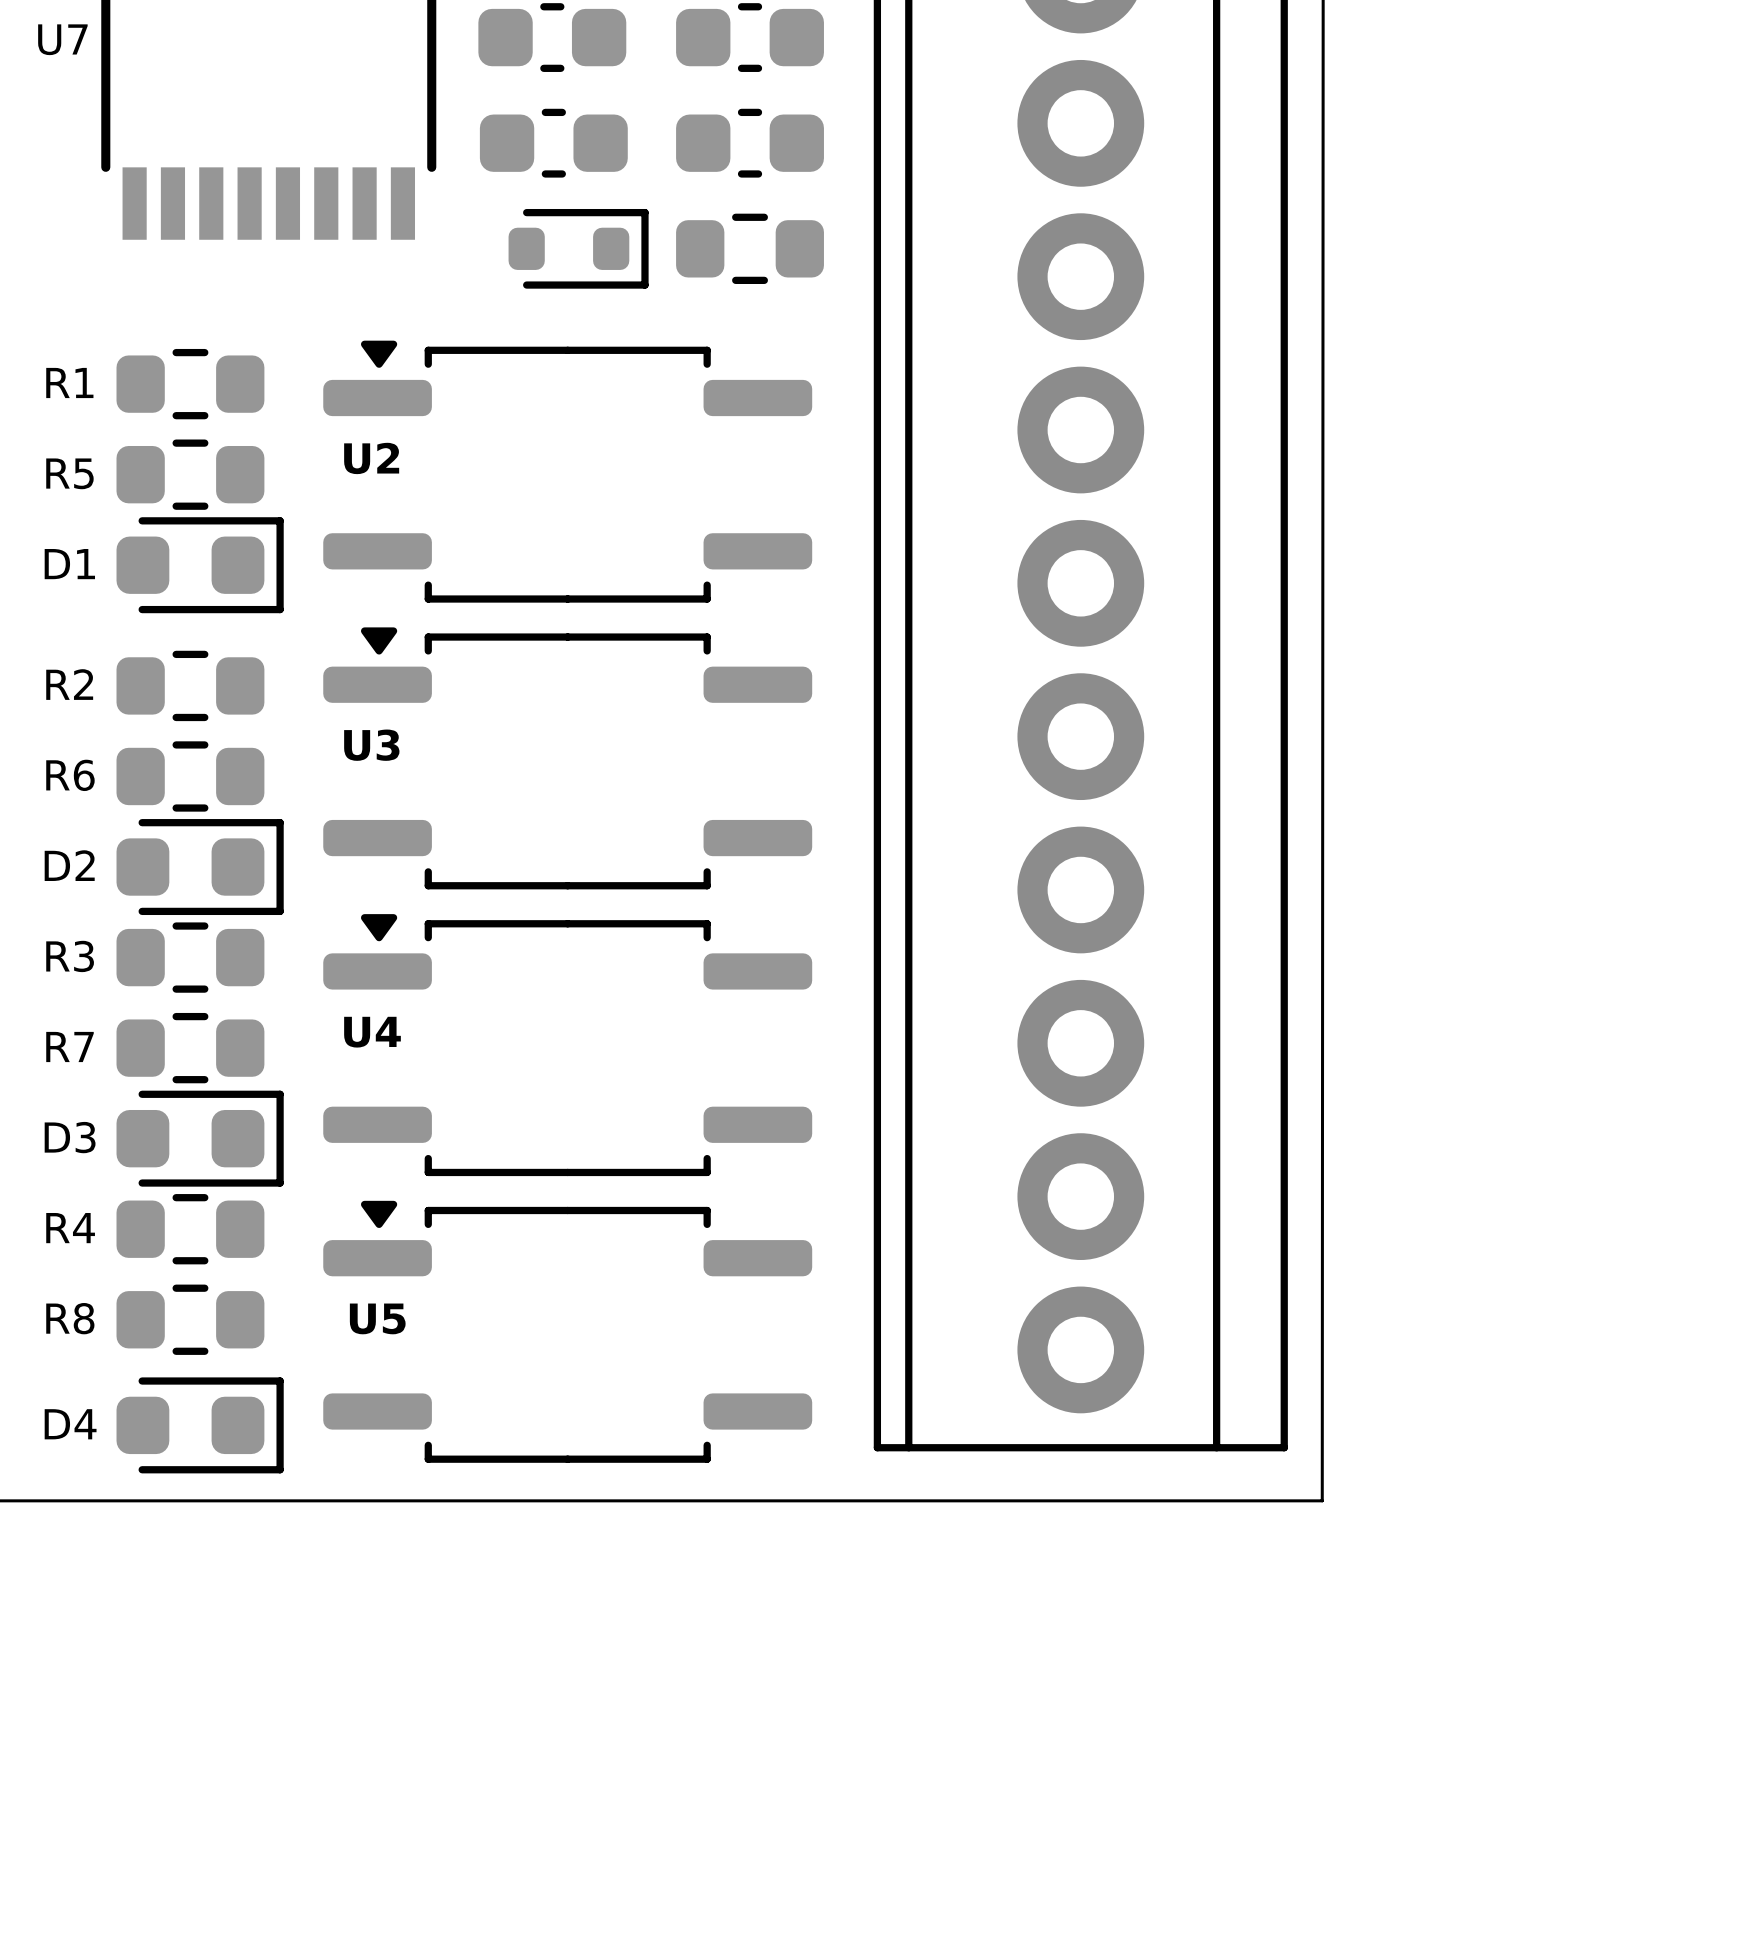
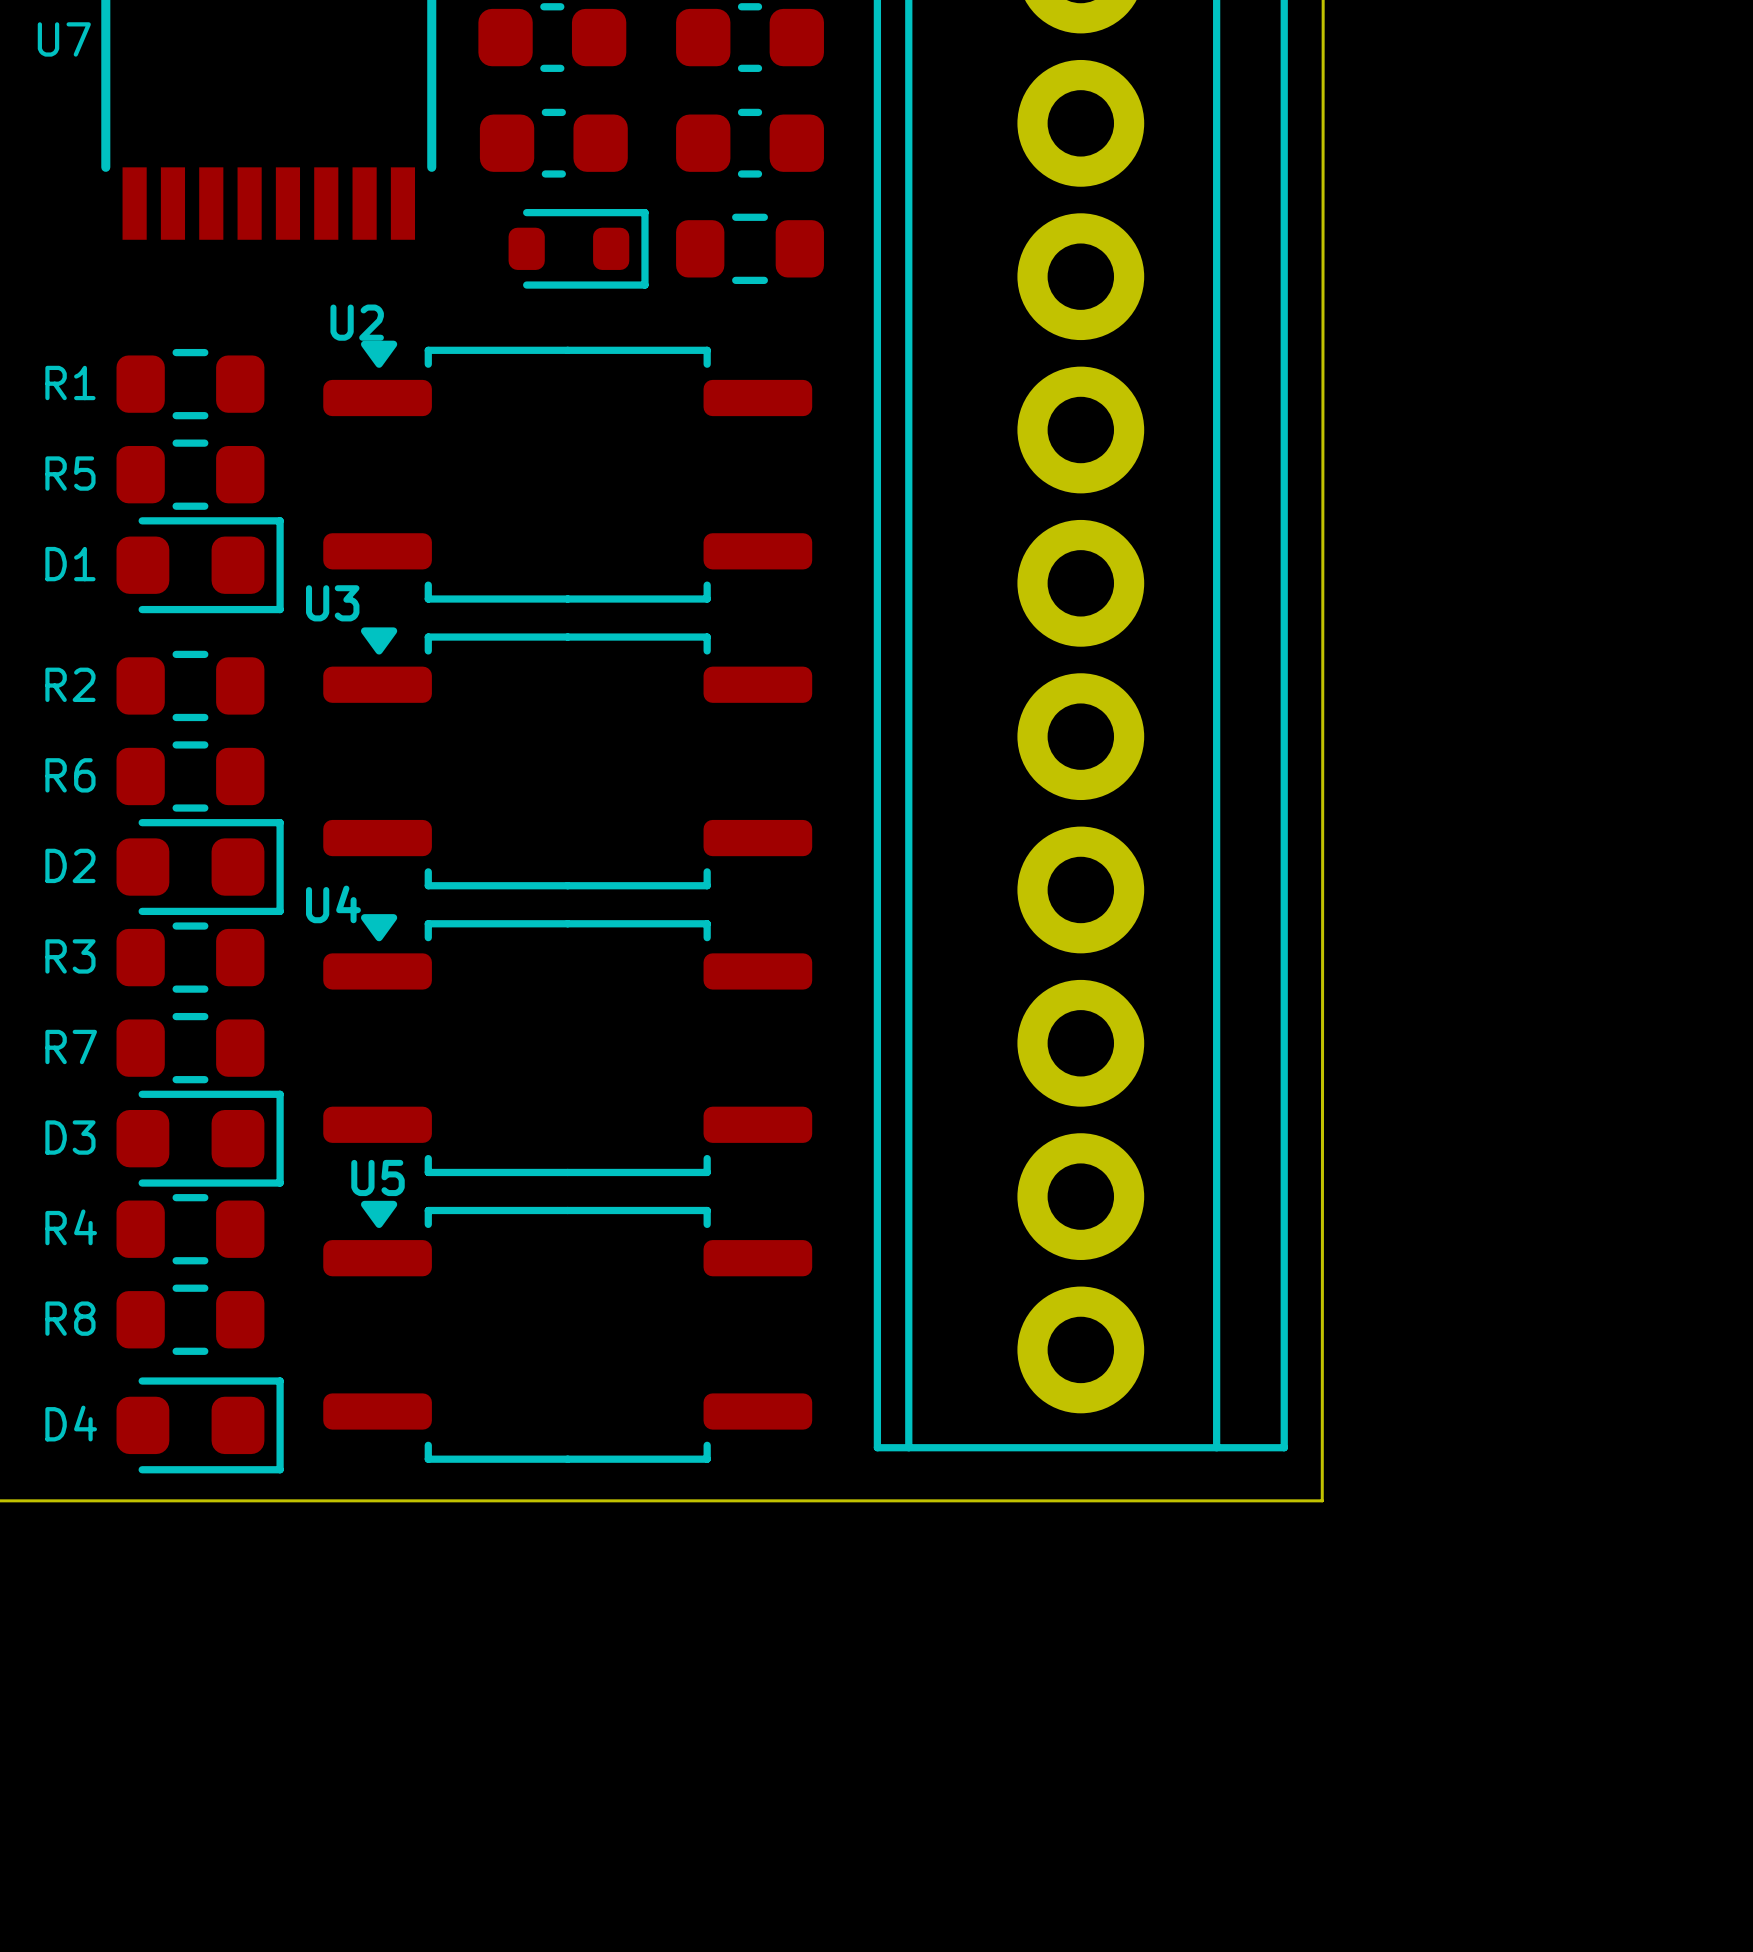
U2 name position: U2 (371, 458) -> U2 (357, 322)
U3 name position: U3 (371, 745) -> U3 (332, 603)
U4 name position: U4 (372, 1032) -> U4 (333, 904)
U5 name position: U5 (377, 1318) -> U5 (378, 1177)

